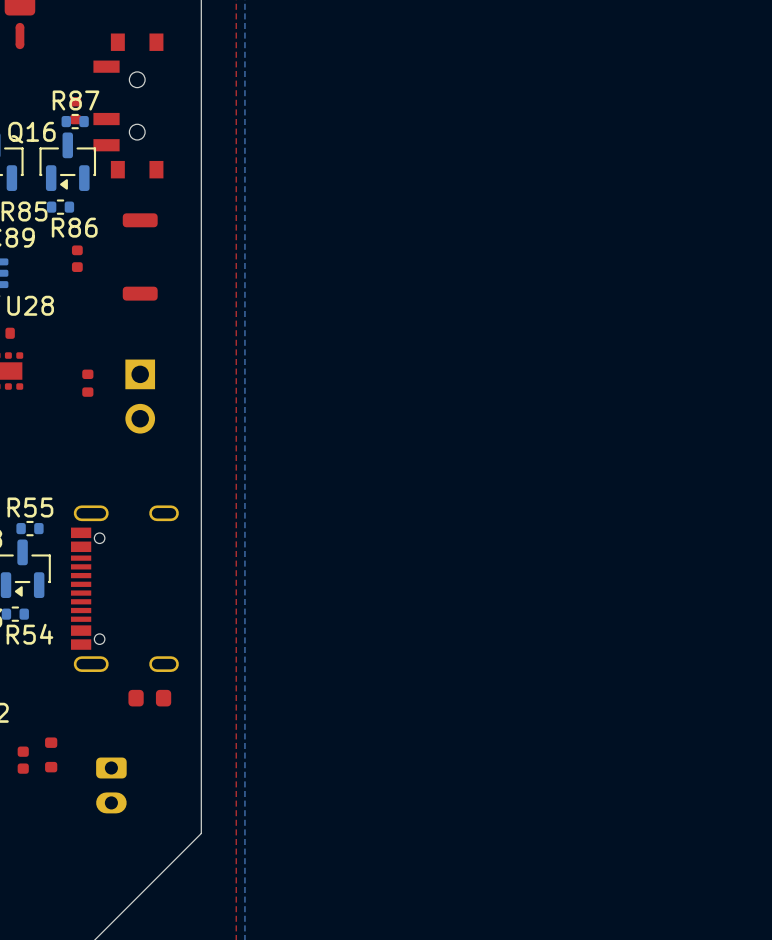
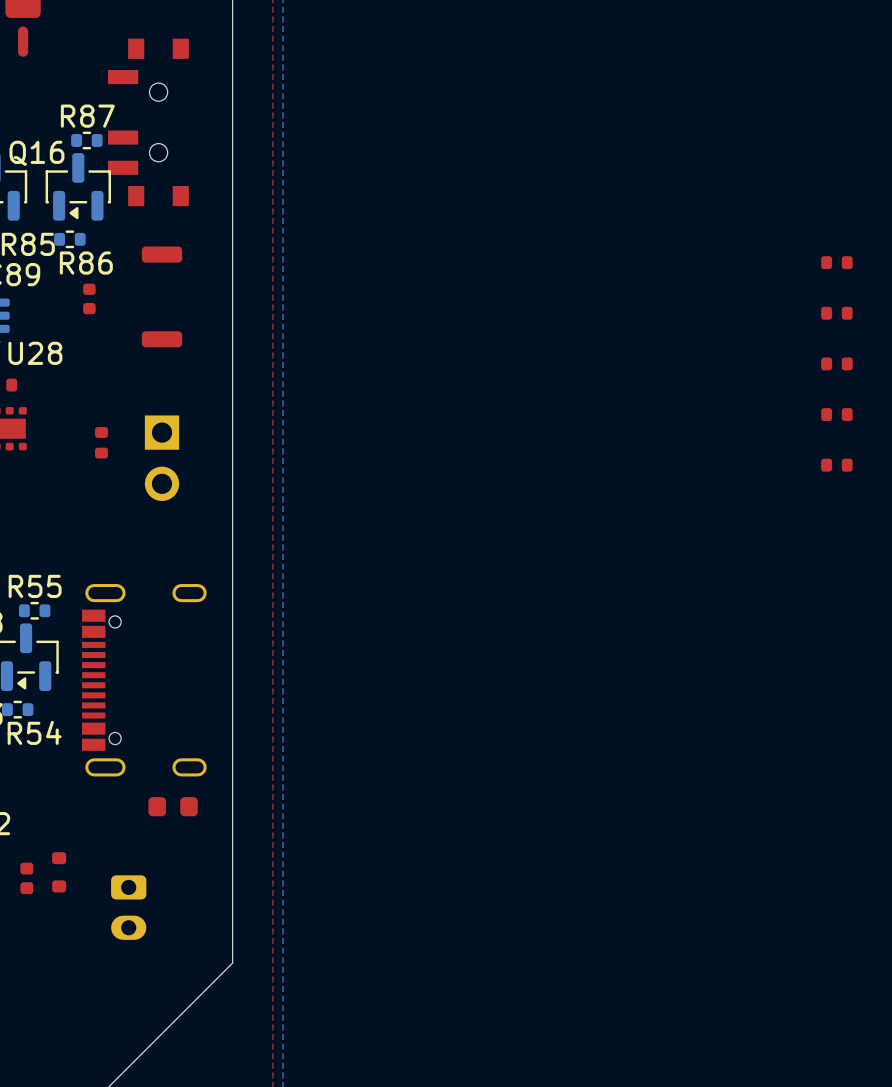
part: (75, 110) -> none
part: none -> (836, 262)
part: none -> (836, 313)
part: none -> (836, 363)
part: none -> (836, 414)
part: none -> (836, 465)

